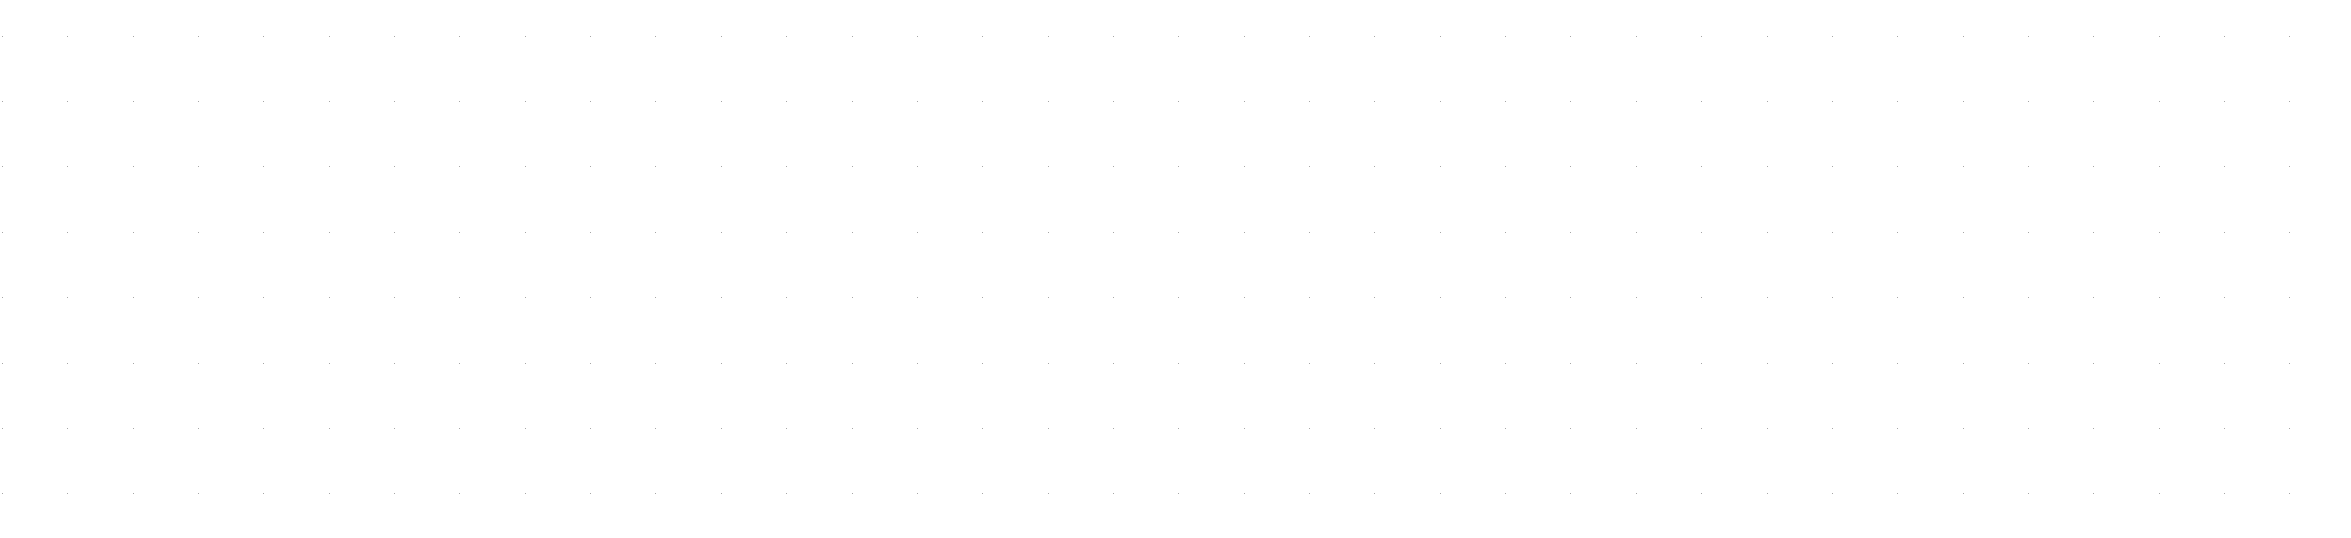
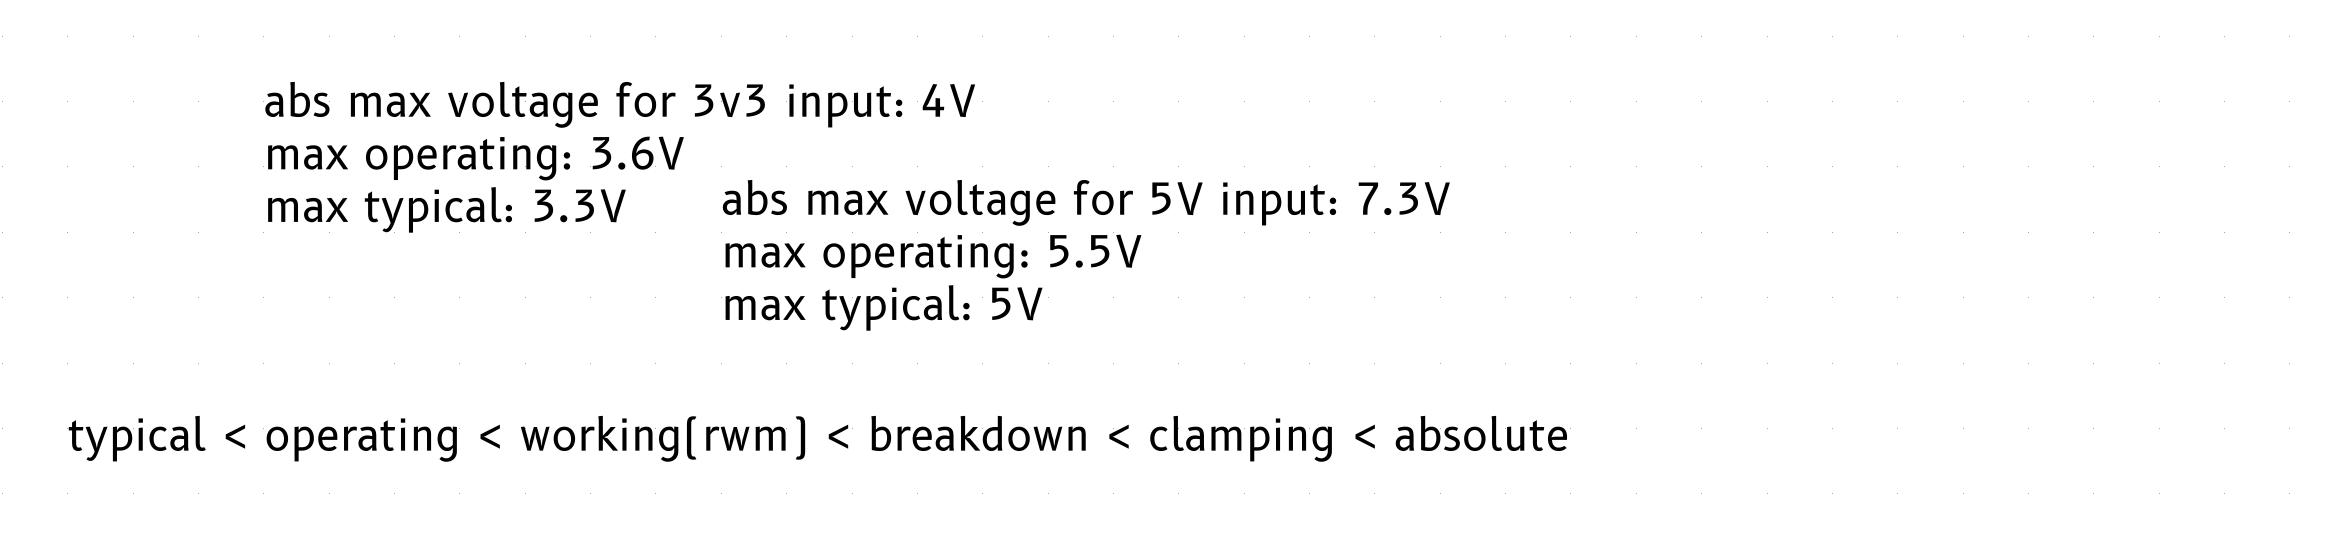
text: none -> abs max voltage for 3v3 input: 4V (620, 104)
text: none -> max operating: 3.6V (476, 158)
text: none -> abs max voltage for 5V input: 7.3V (1086, 202)
text: none -> max typical: 3.3V (446, 209)
text: none -> max operating: 5.5V (933, 256)
text: none -> max typical: 5V (884, 307)
text: none -> typical < operating < working(rwm) < breakdown < clamping < absolute (817, 438)

